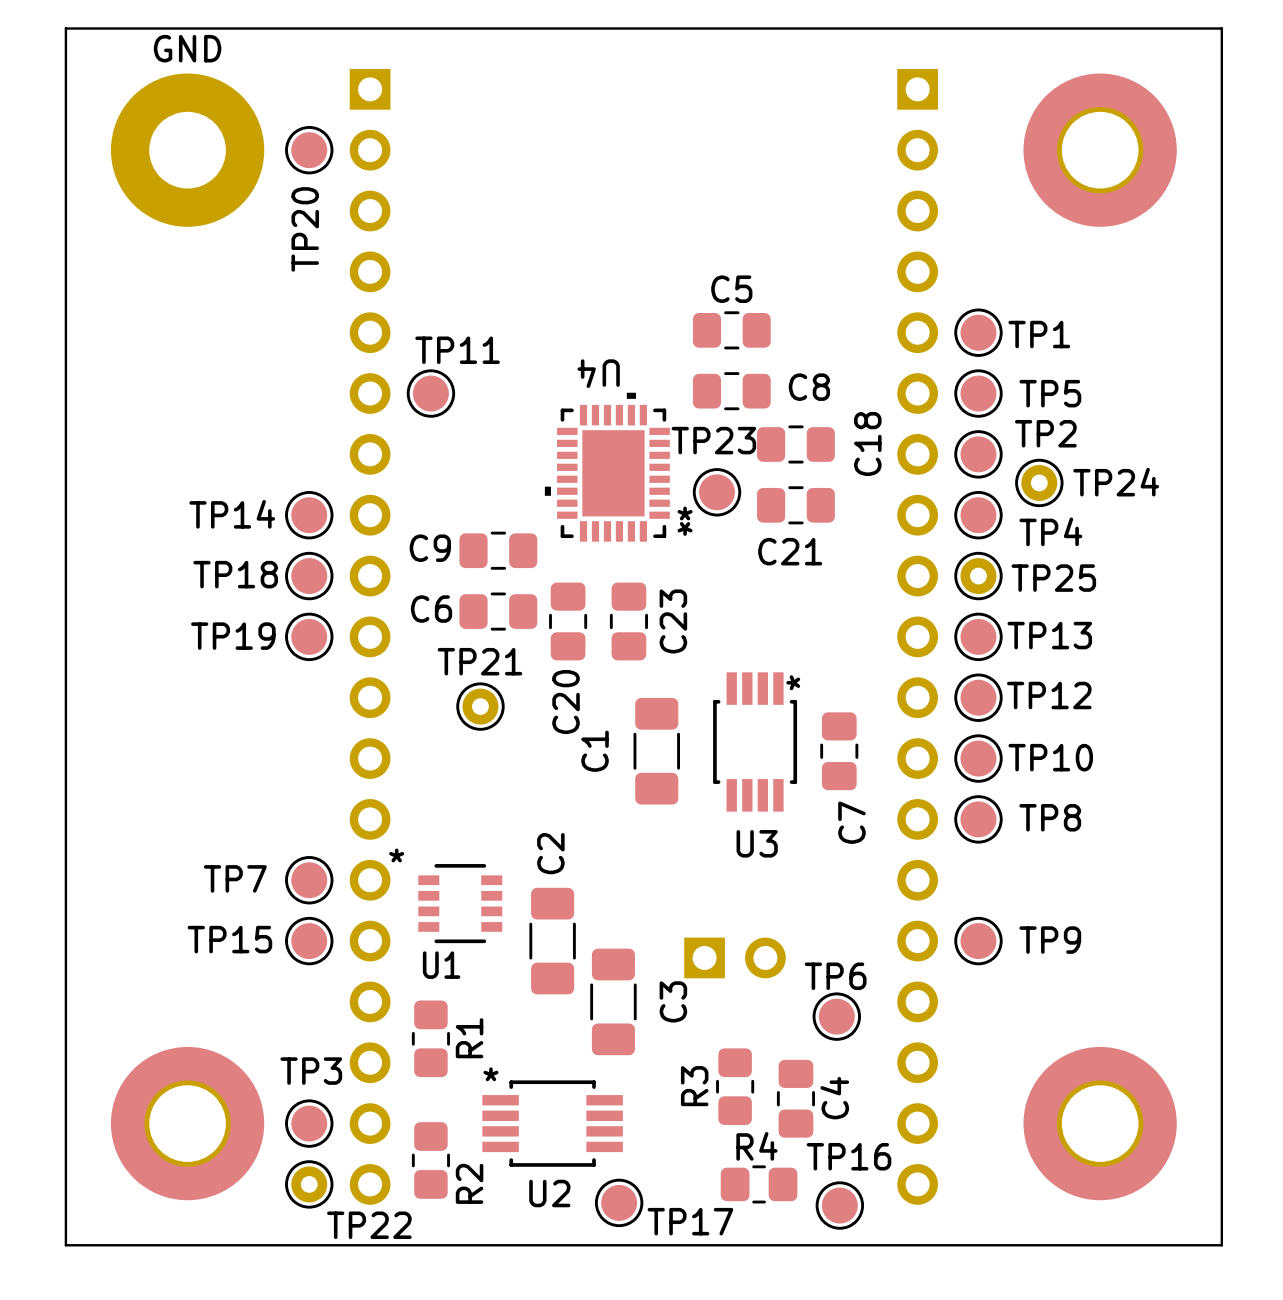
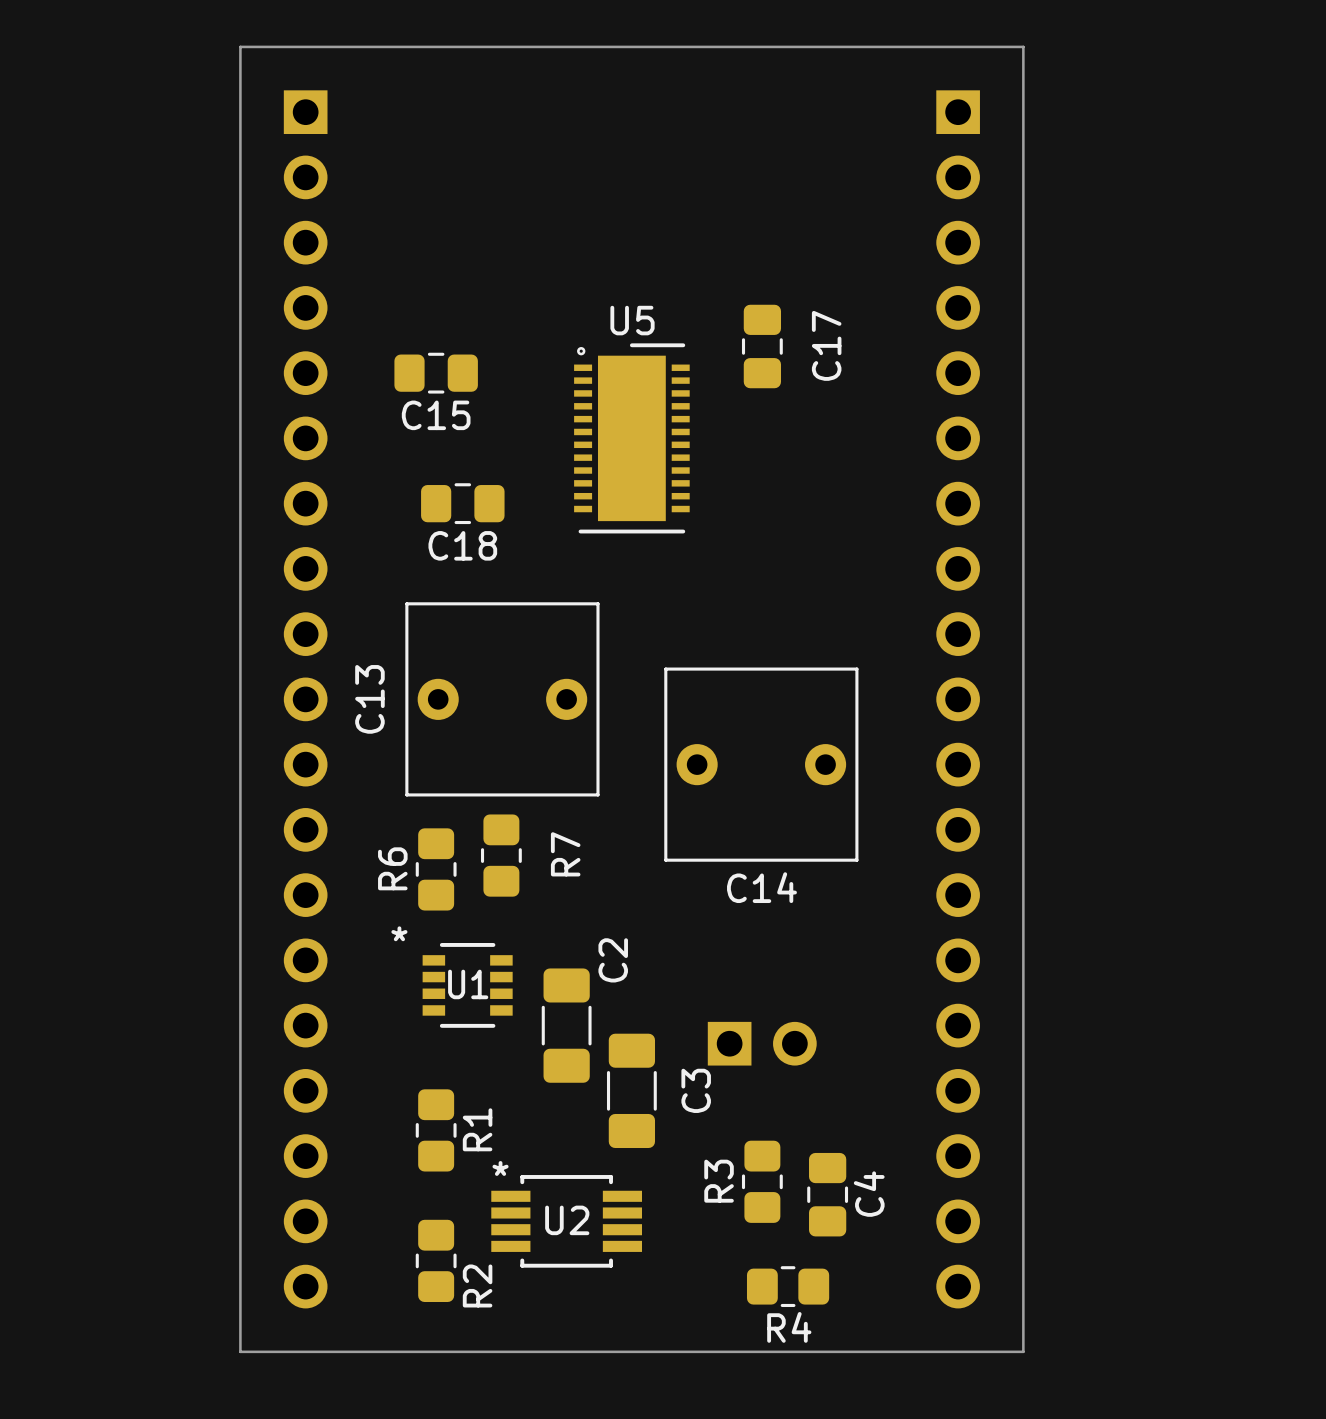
board edge: (248, 28) (65, 28) (65, 1245) (248, 1245) -> (240, 46) (240, 1351)
board edge: (978, 28) (1221, 28) (1221, 1245) (978, 1245) -> (1023, 46) (1023, 1351)
GND: (187, 150) -> none
TP20: (309, 150) -> none
part: (1100, 150) -> none
C17: none -> (762, 346)
C5: (731, 330) -> none
C15: none -> (436, 373)
TP1: (978, 332) -> none
C8: (731, 391) -> none
TP11: (430, 393) -> none
U5: none -> (631, 438)
TP5: (978, 393) -> none
C18 position: (795, 444) -> (462, 503)
C18 name rotation: 0° (867, 444) -> 90° clockwise (462, 545)
C18 name position: C18 (867, 444) -> C18 (462, 545)
TP2: (978, 454) -> none
U4: (607, 467) -> none
TP24: (1039, 482) -> none
TP23: (716, 492) -> none
C21: (795, 505) -> none
TP14: (309, 515) -> none
TP4: (978, 515) -> none
C9: (498, 550) -> none
TP18: (309, 576) -> none
TP25: (978, 576) -> none
C6: (498, 611) -> none
C20: (568, 621) -> none
C23: (628, 621) -> none
TP19: (309, 636) -> none
part position: (370, 636) -> (305, 699)
C13: none -> (502, 699)
TP13: (978, 636) -> none
C14: none -> (761, 764)
TP12: (978, 697) -> none
TP21: (480, 706) -> none
U3: (755, 741) -> none
C1: (656, 751) -> none
C7: (839, 751) -> none
TP10: (978, 758) -> none
R7: none -> (501, 855)
R6: none -> (436, 869)
TP8: (978, 819) -> none
C2 name position: C2 (550, 853) -> C2 (613, 960)
TP7: (309, 880) -> none
TP15: (309, 941) -> none
TP9: (978, 941) -> none
U1 name position: U1 (441, 965) -> U1 (468, 984)
TP6: (836, 1016) -> none
part: (187, 1123) -> none
TP3: (309, 1123) -> none
part: (1100, 1123) -> none
R4 name position: R4 (756, 1146) -> R4 (789, 1327)
TP22: (309, 1184) -> none
U2 name position: U2 (549, 1193) -> U2 (567, 1220)
TP17: (619, 1202) -> none
TP16: (839, 1205) -> none

